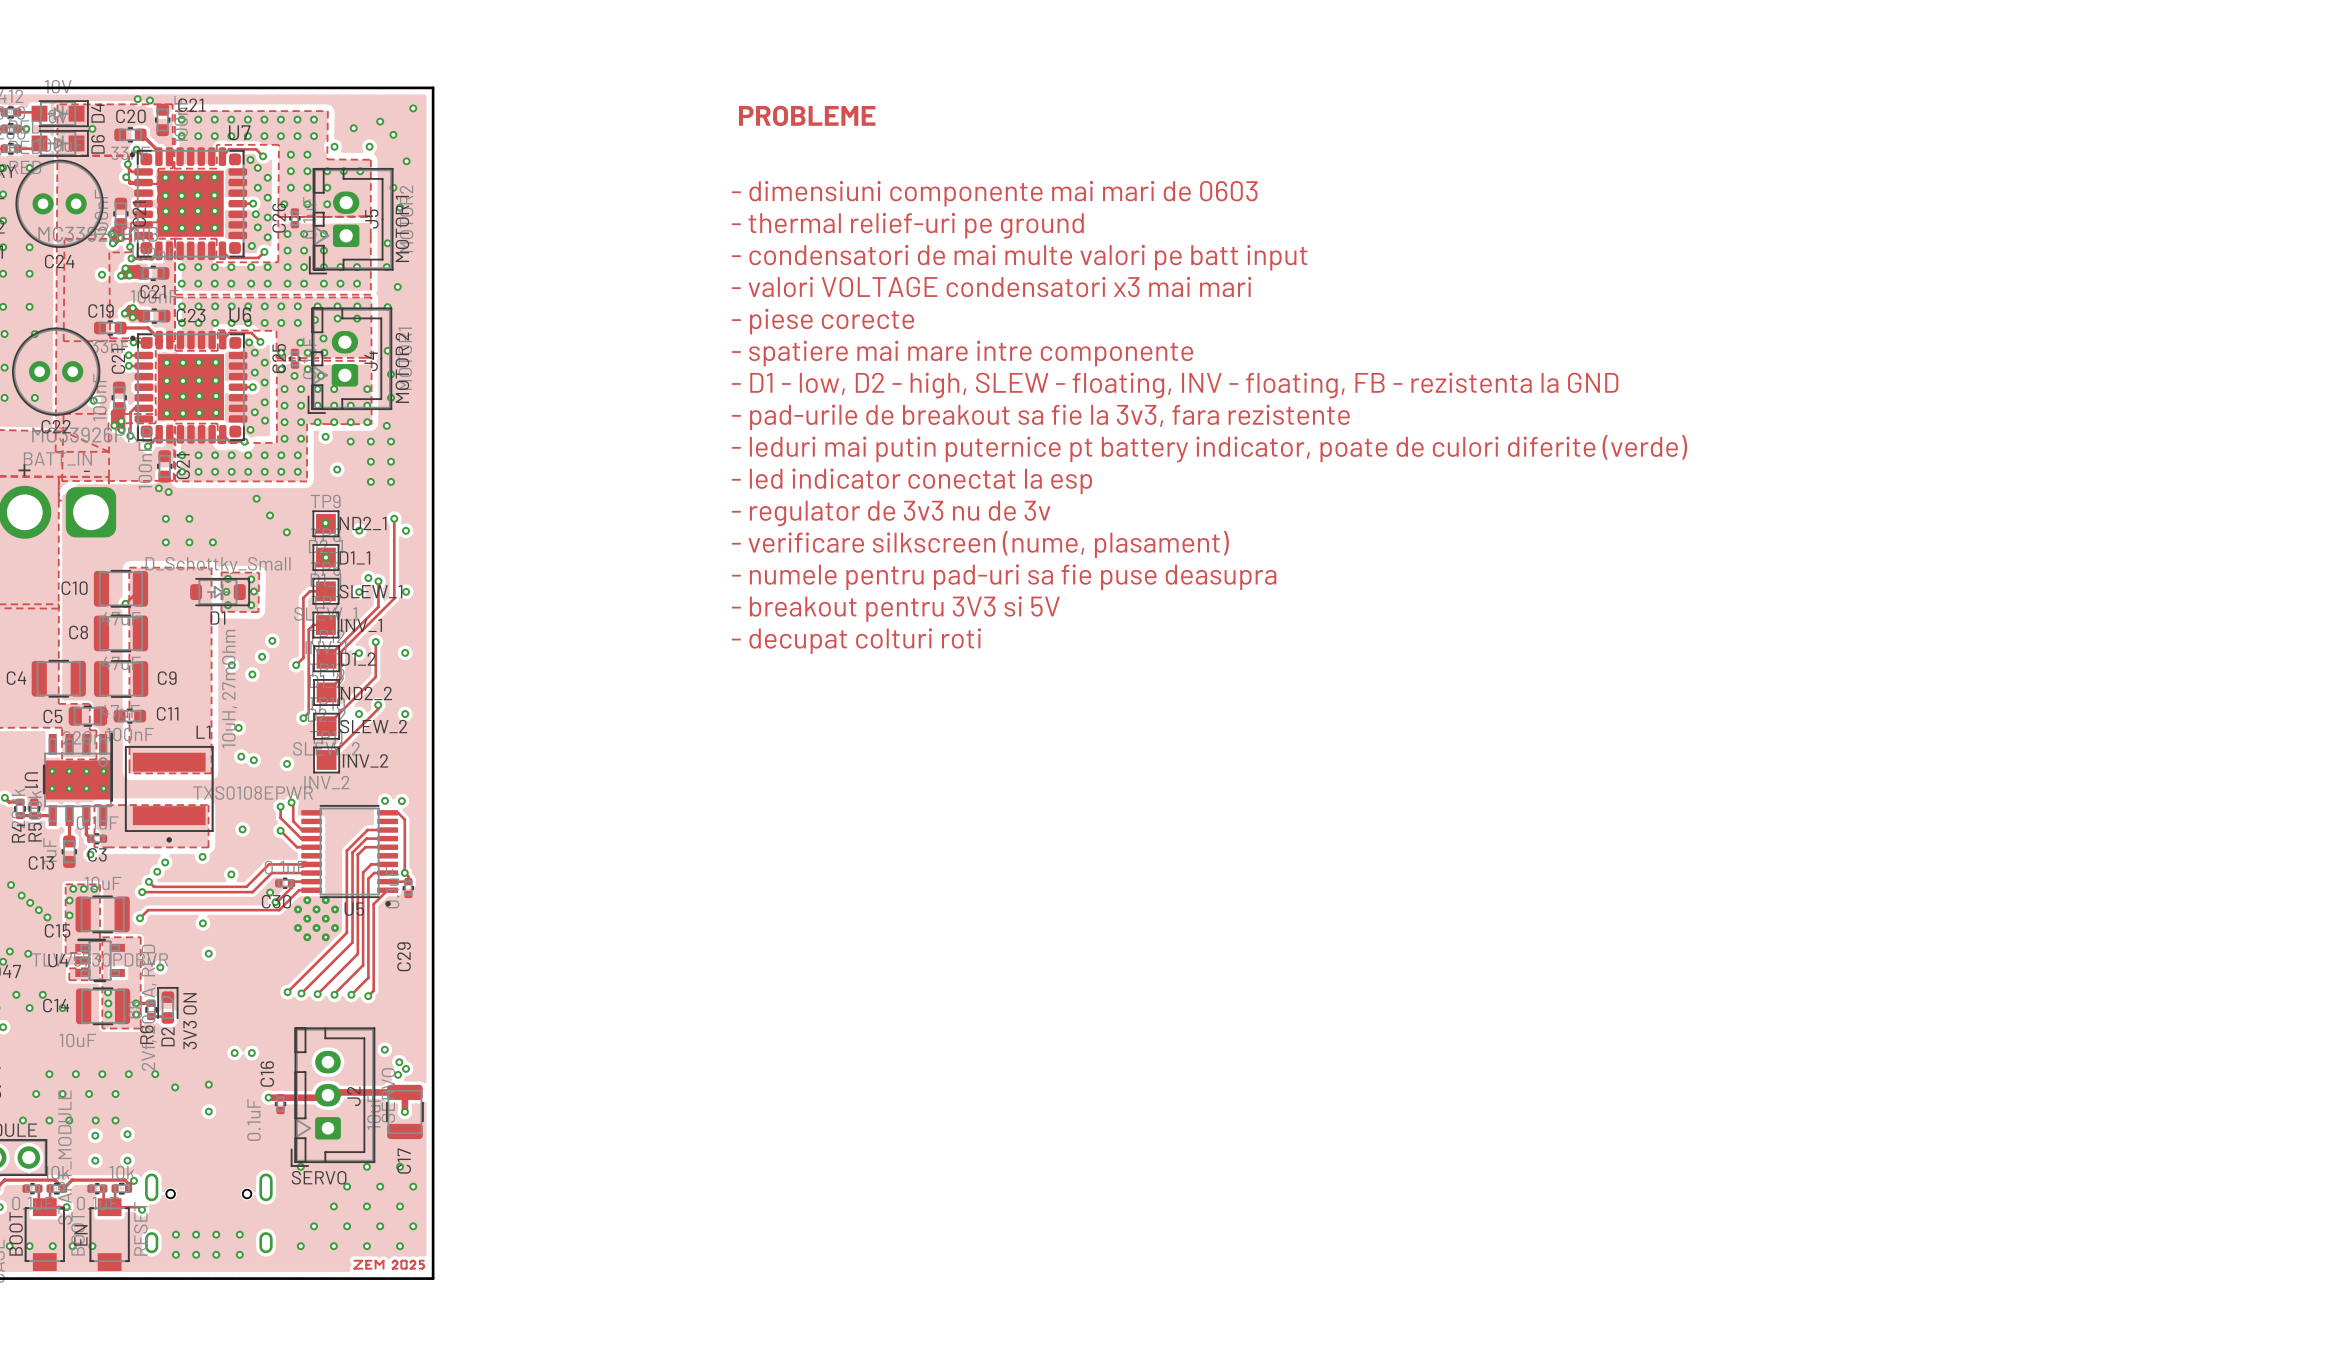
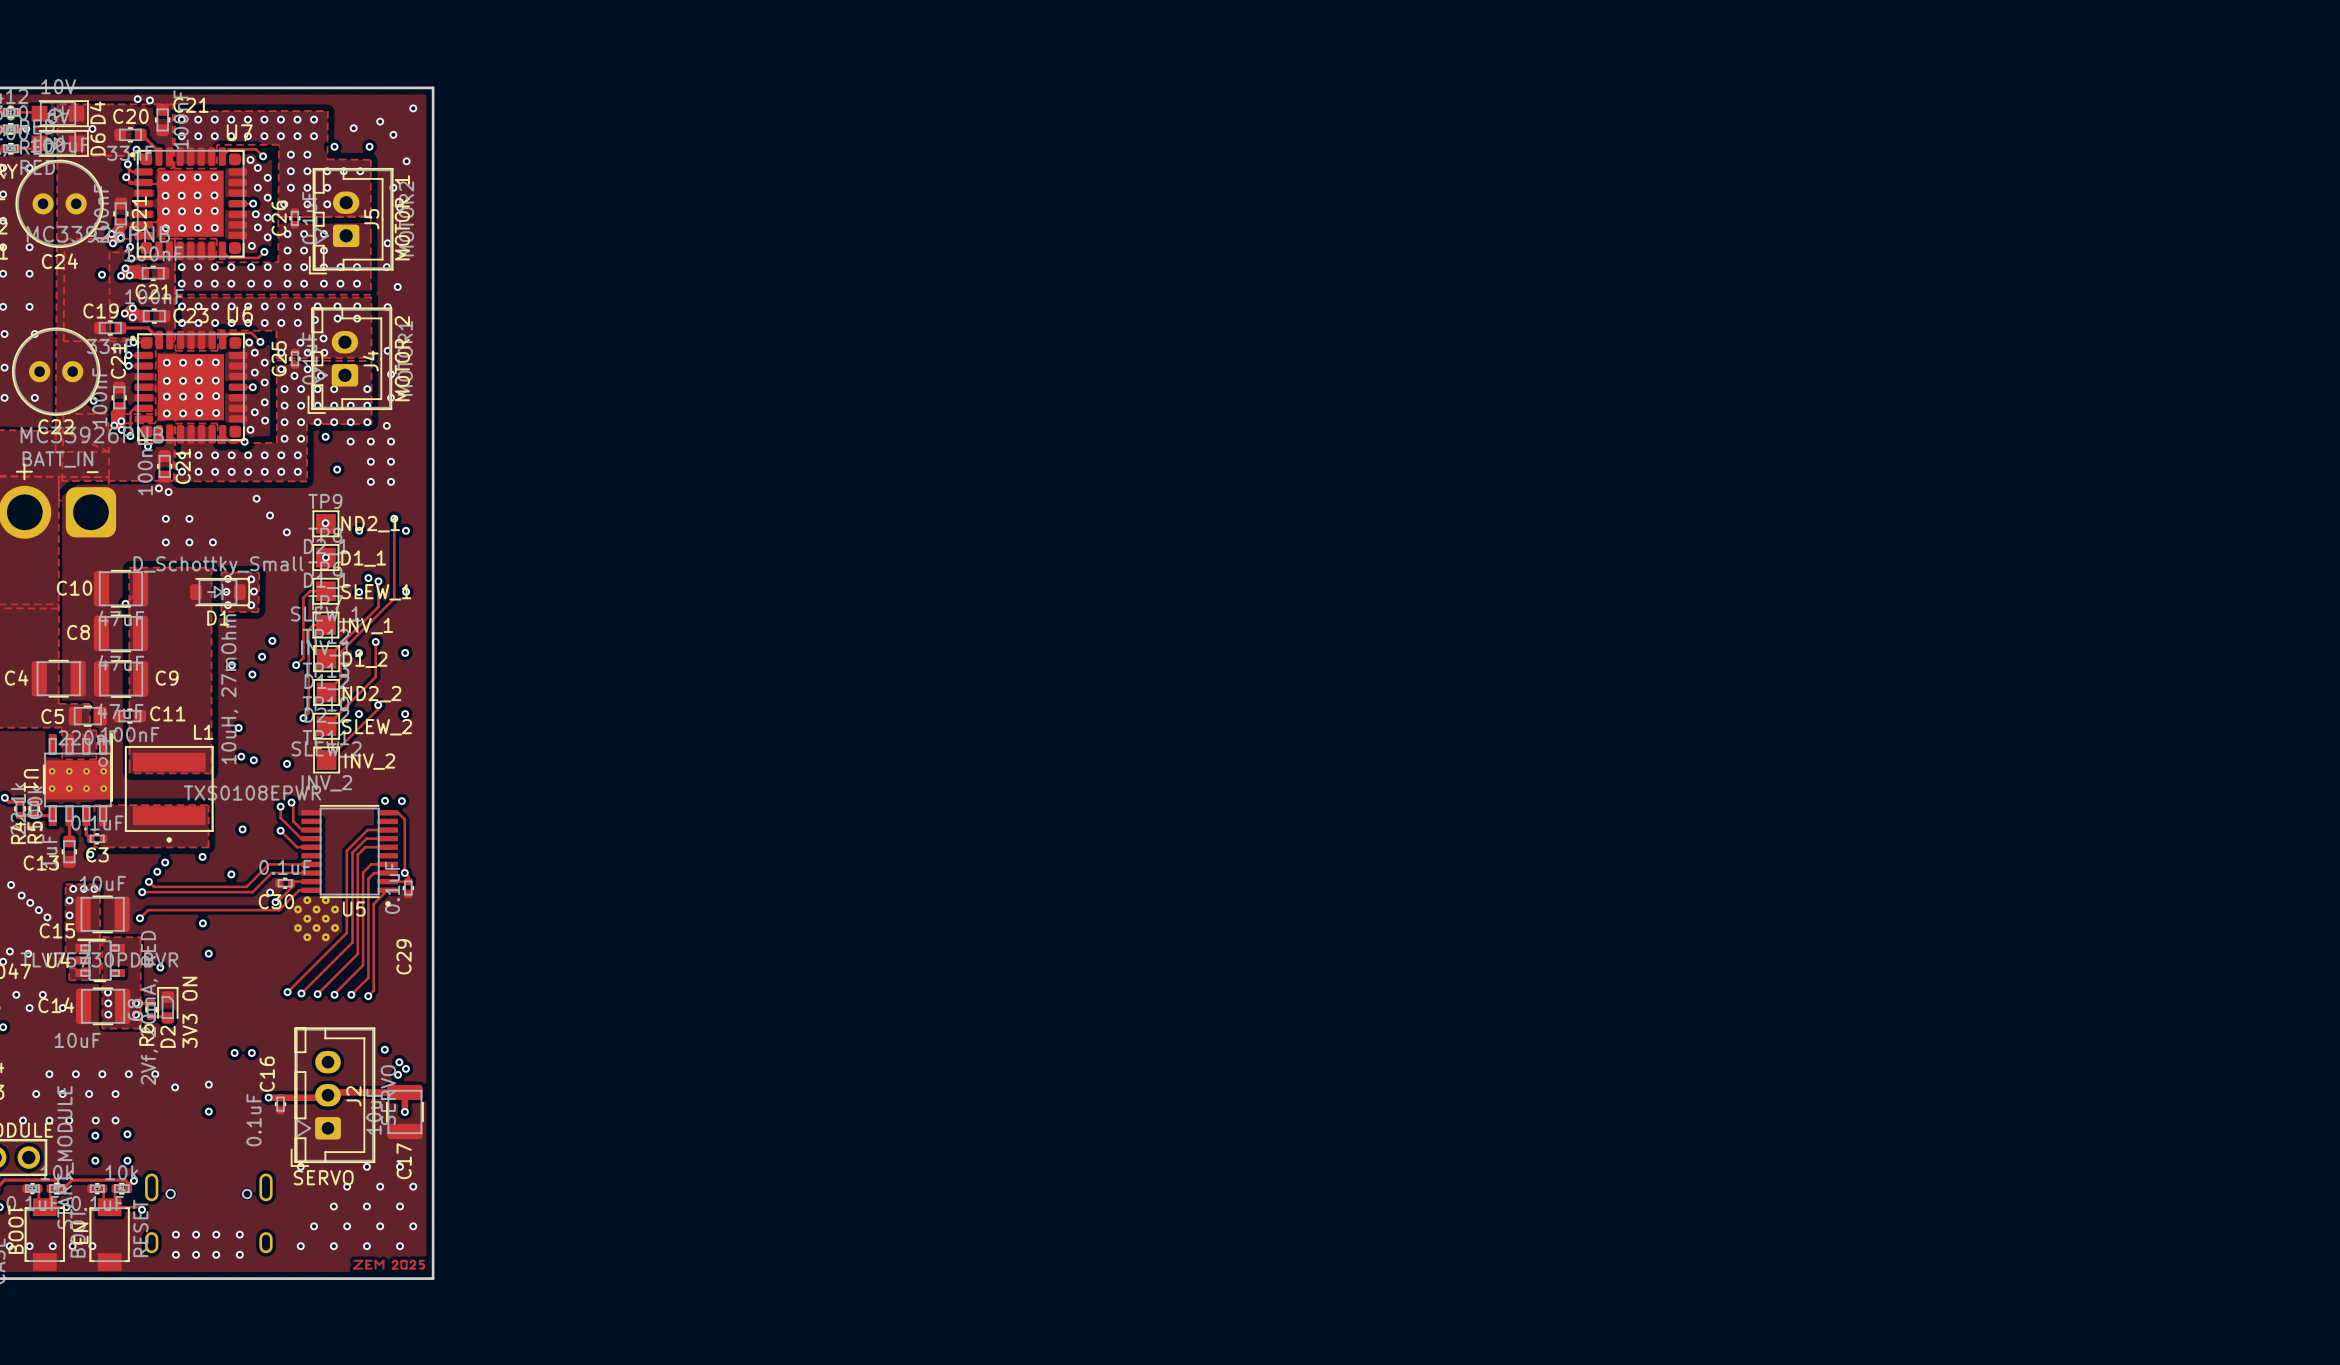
text: PROBLEME (807, 115) -> none
text: - dimensiuni componente mai mari de 0603 (994, 193) -> none
text: - thermal relief-uri pe ground (907, 225) -> none
text: - condensatori de mai multe valori pe batt input (1019, 257) -> none
text: - valori VOLTAGE condensatori x3 mai mari (991, 286) -> none
text: - piese corecte (822, 321) -> none
text: - spatiere mai mare intre componente (962, 353) -> none
text: - D1 - low, D2 - high, SLEW - floating, INV - floating, FB - rezistenta la GND (1175, 385) -> none
text: - pad-urile de breakout sa fie la 3v3, fara rezistente (1040, 417) -> none
text: - leduri mai putin puternice pt battery indicator, poate de culori diferite (verde) (1209, 448) -> none
text: - led indicator conectat la esp (911, 481) -> none
text: - regulator de 3v3 nu de 3v (891, 513) -> none
text: - verificare silkscreen (nume, plasament) (980, 544) -> none
text: - numele pentru pad-uri sa fie puse deasupra (1004, 577) -> none
text: - breakout pentru 3V3 si 5V (895, 609) -> none
text: - decupat colturi roti (856, 641) -> none

